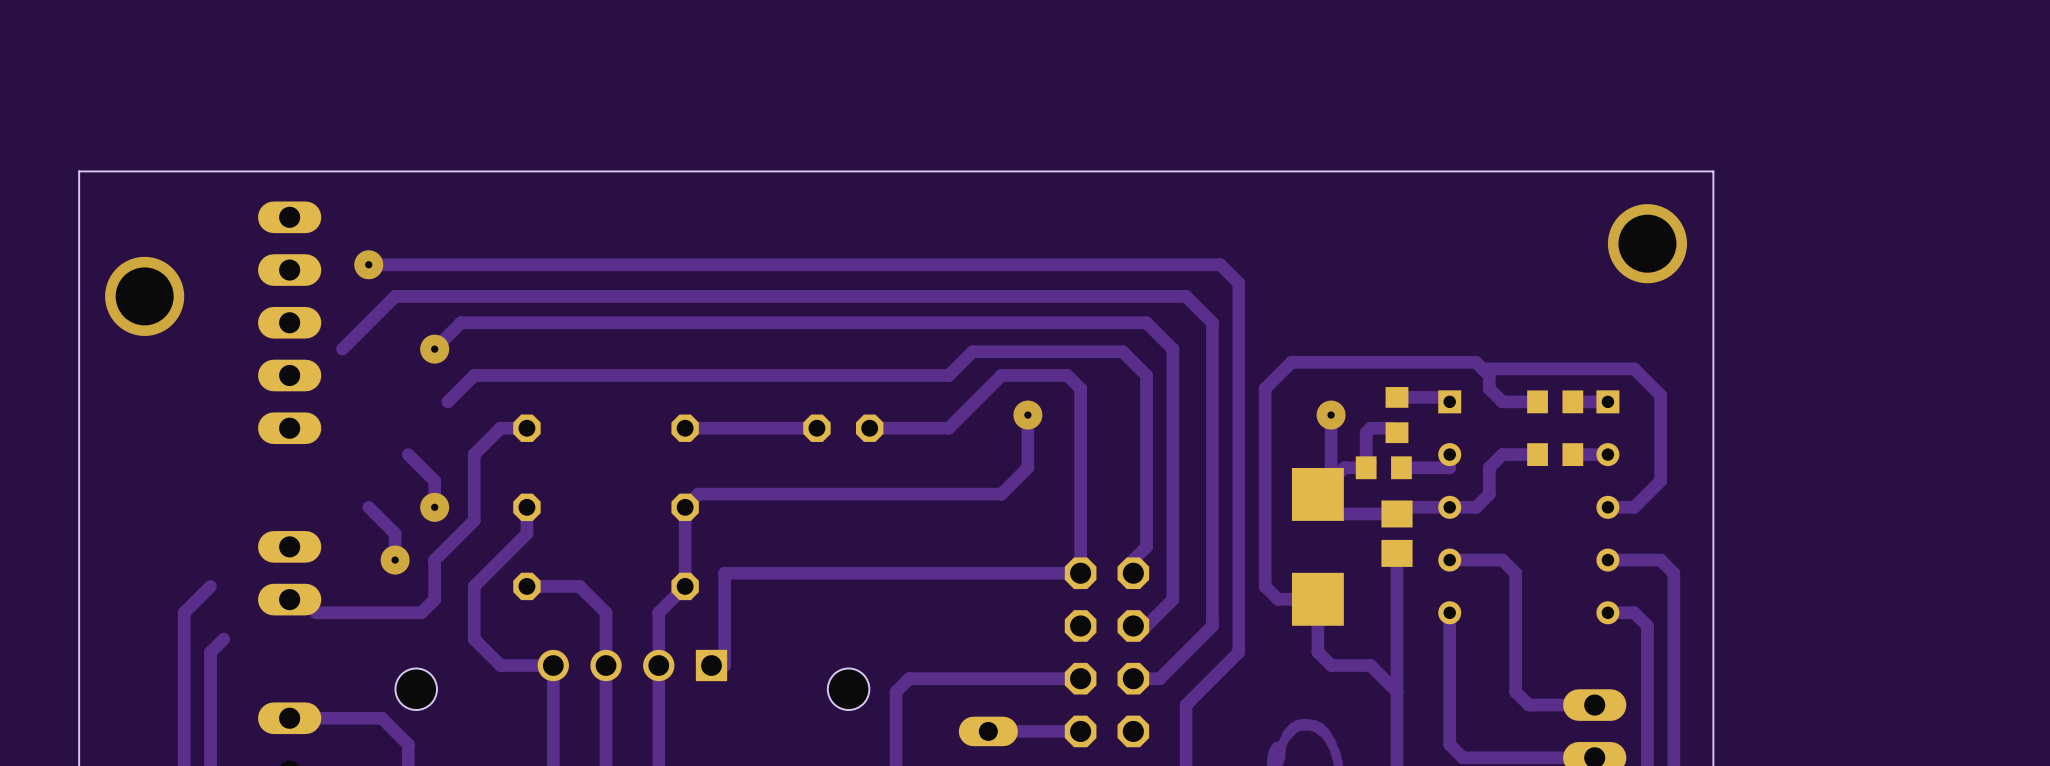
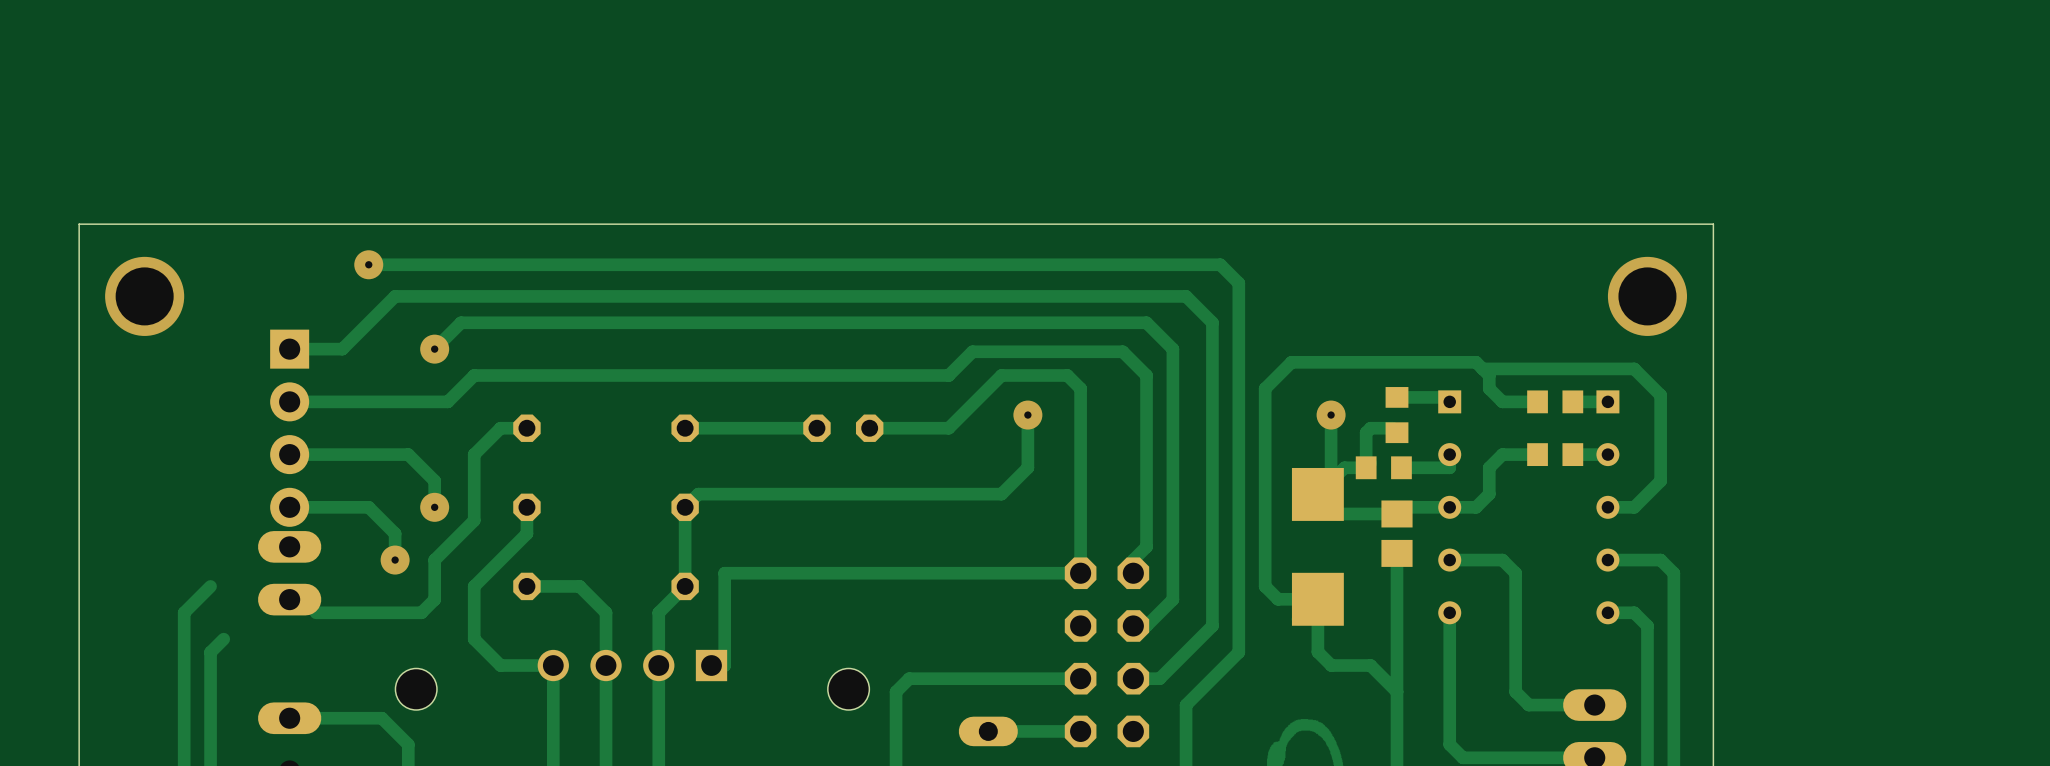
board edge: (1713, 224) (1713, 171) (79, 171) (79, 224) -> (1713, 224) (79, 224)
via position: (1647, 243) -> (1647, 296)
part: (289, 322) -> none
track: none -> (342, 349) (289, 349)
track: none -> (447, 401) (289, 401)
part: none -> (289, 428)
track: none -> (408, 454) (289, 454)
track: none -> (368, 507) (289, 507)

